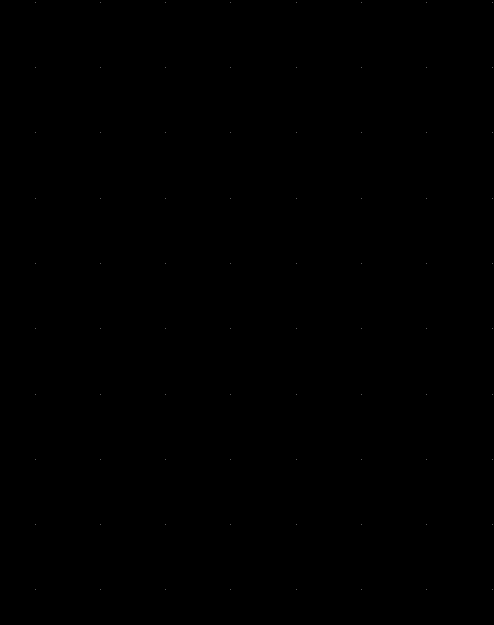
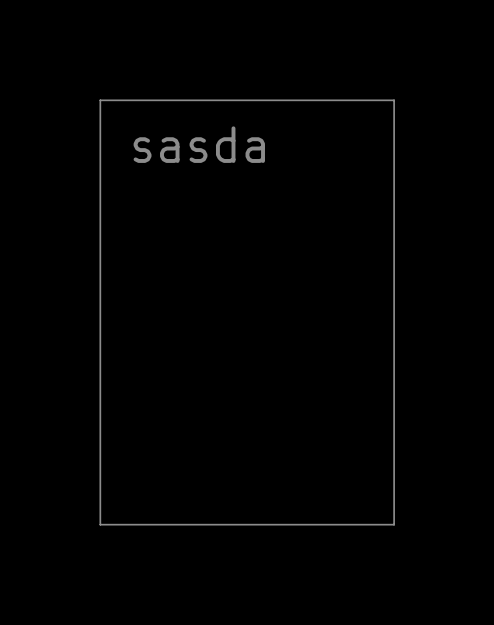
line: none -> (100, 100) (394, 100) (394, 524) (100, 524) (100, 100)
text: none -> sasda (199, 144)

